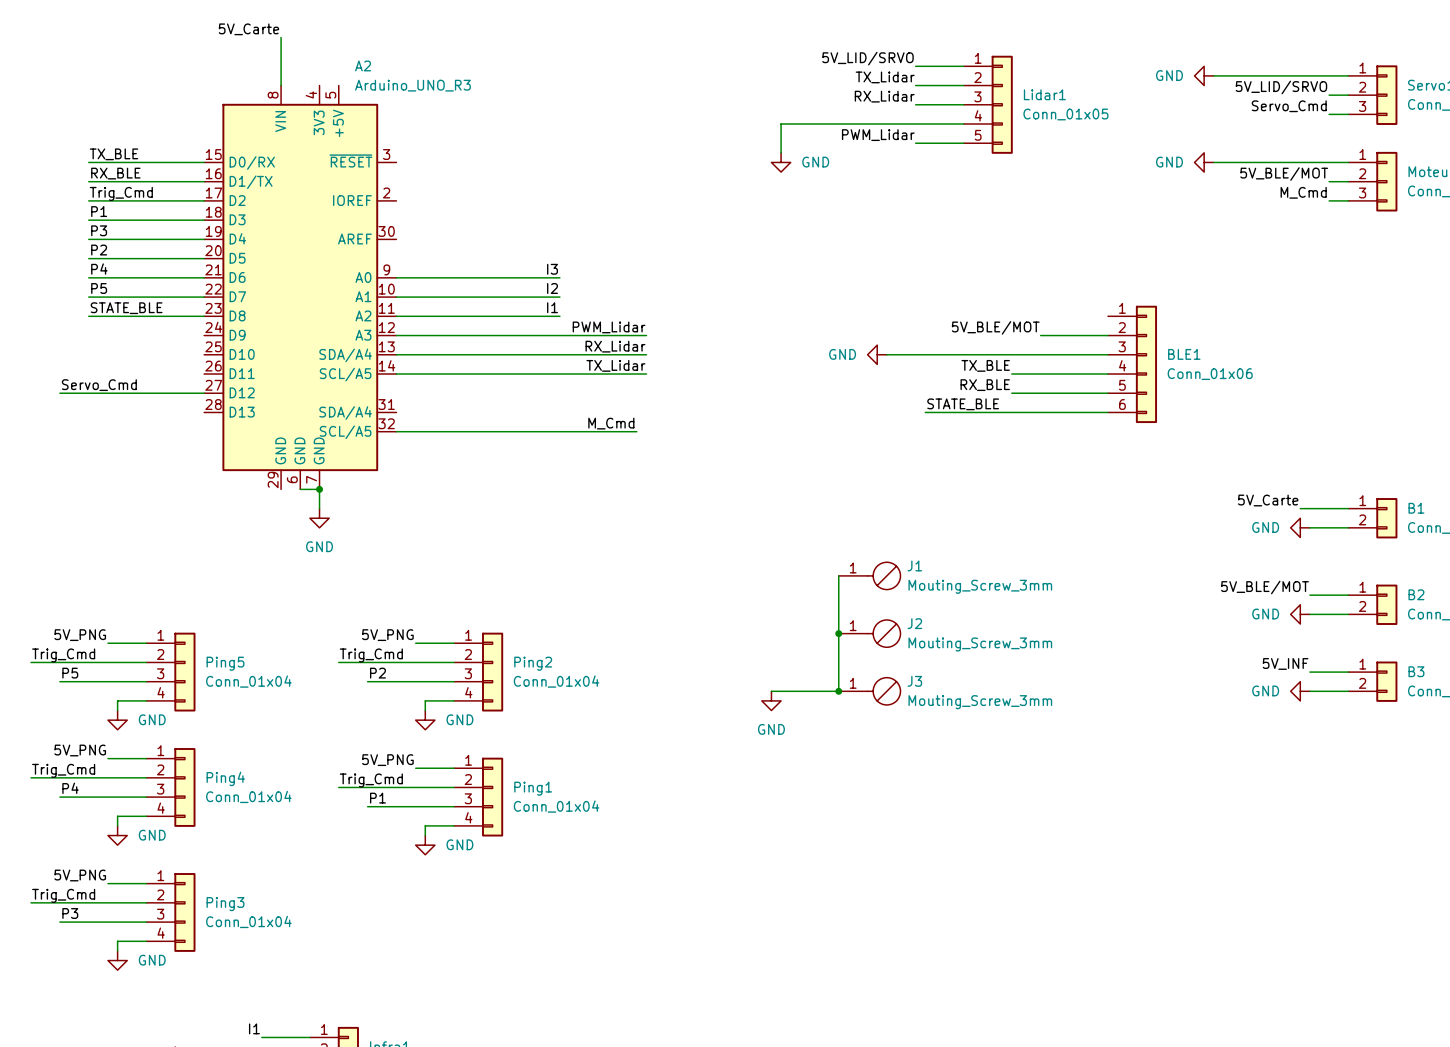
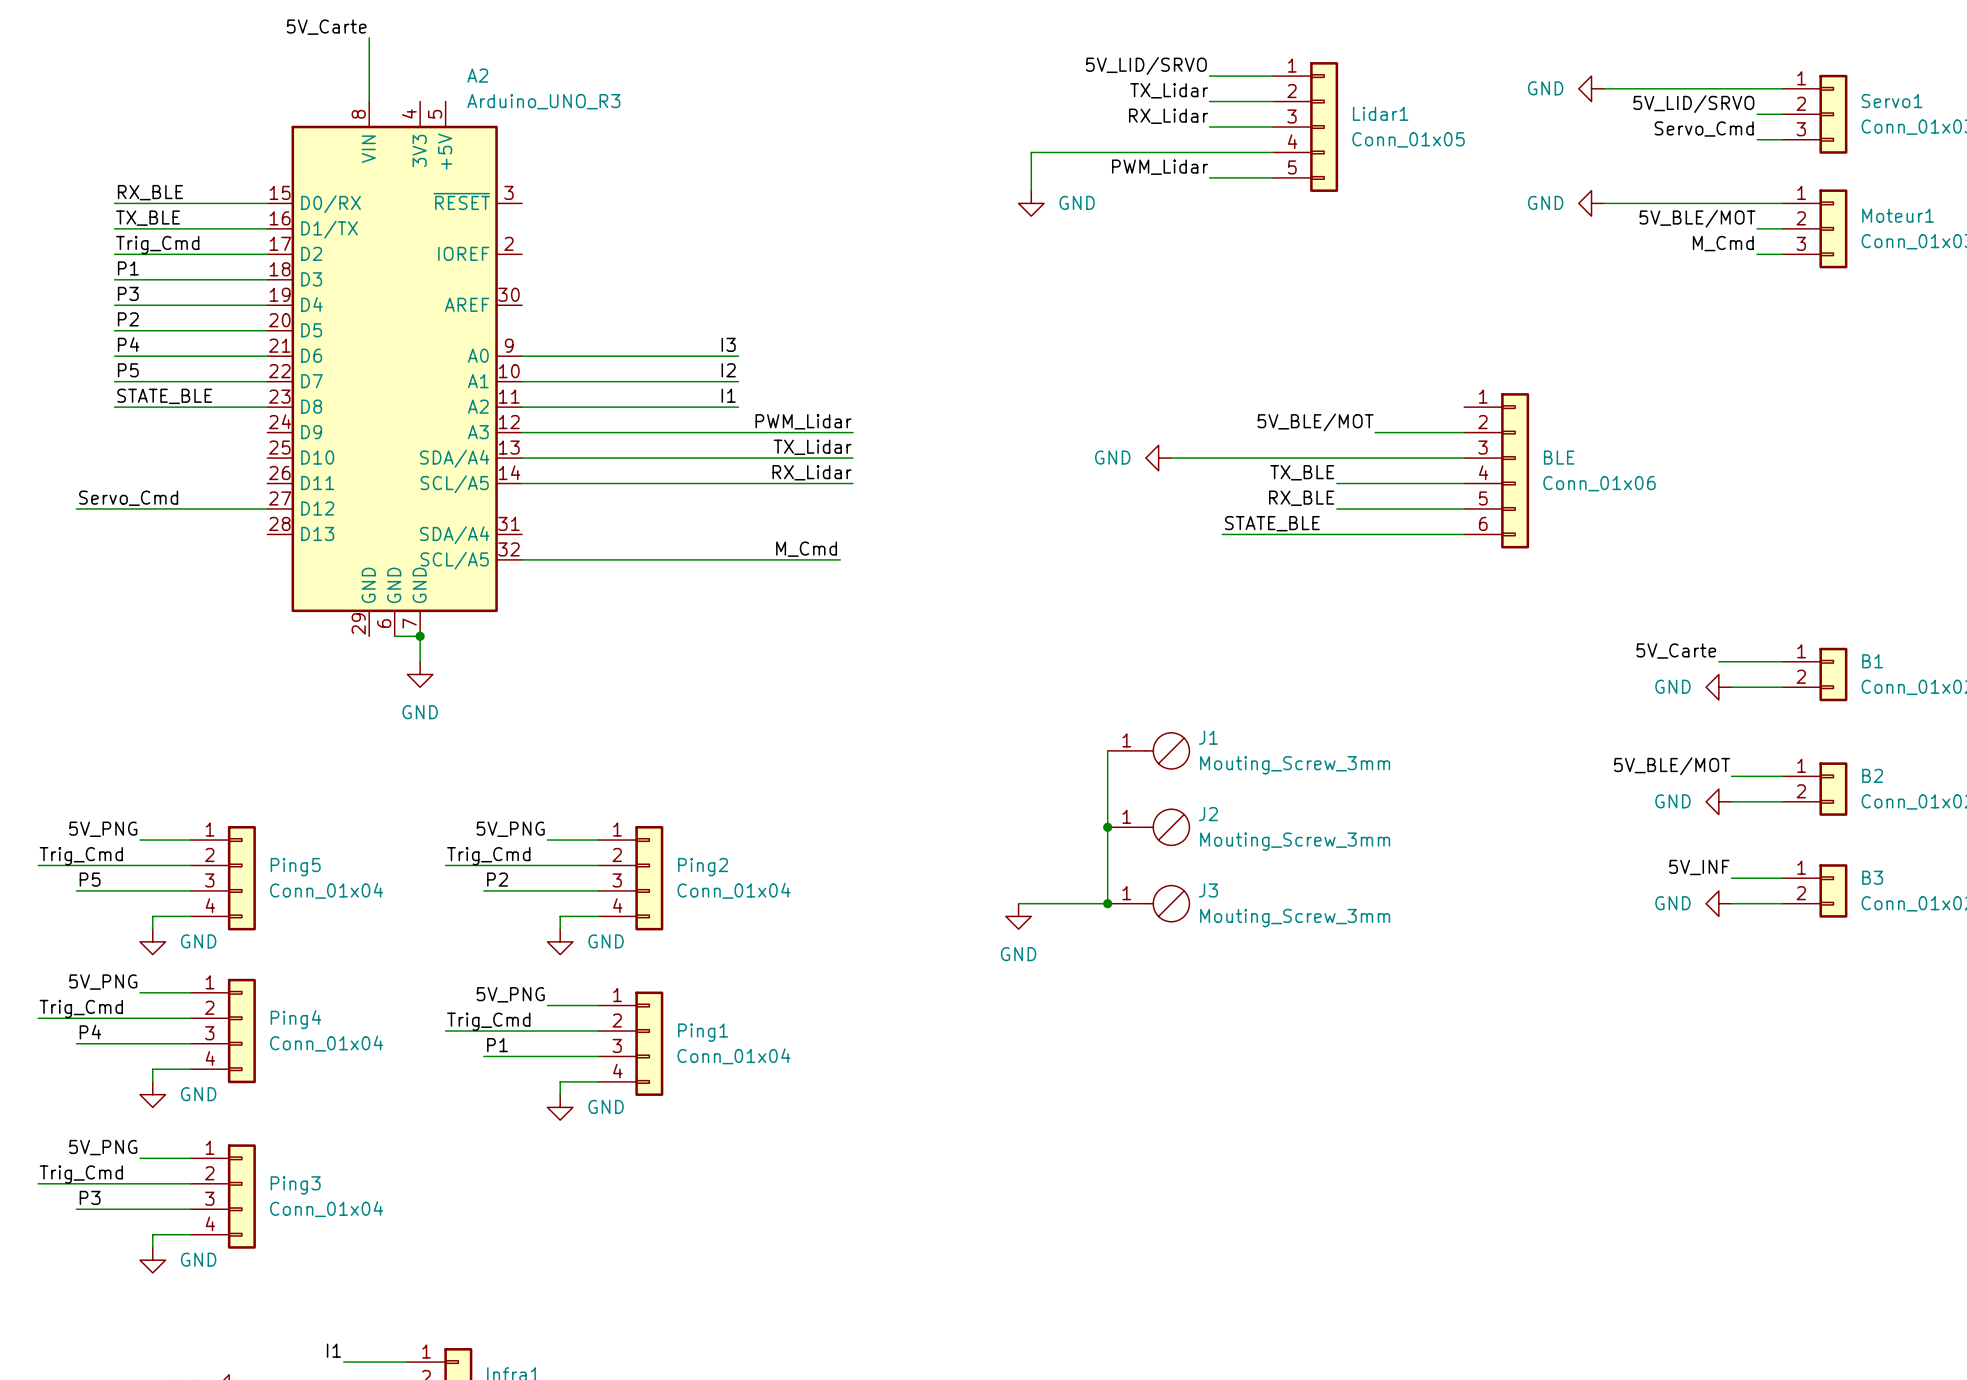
label: TX_BLE (114, 154) -> RX_BLE (150, 192)
label: RX_BLE (115, 173) -> TX_BLE (148, 218)
label: RX_Lidar (615, 346) -> TX_Lidar (812, 447)
BLE1 name: BLE1 (1184, 354) -> BLE (1559, 457)
label: TX_Lidar (615, 365) -> RX_Lidar (812, 472)

